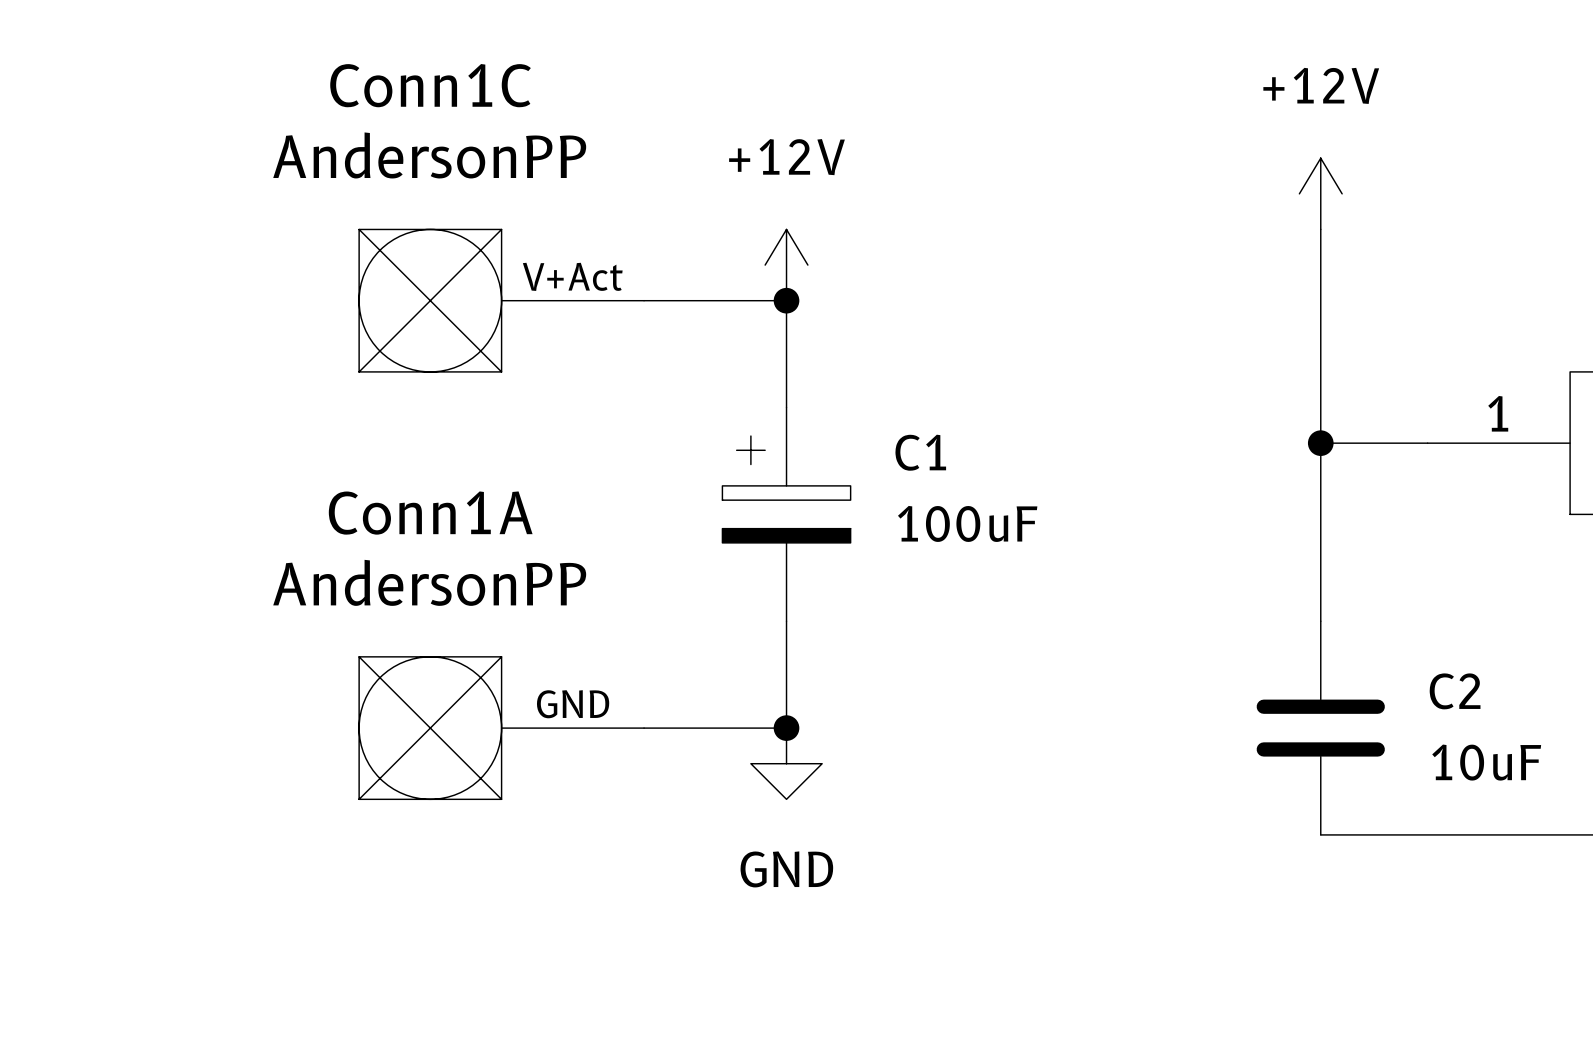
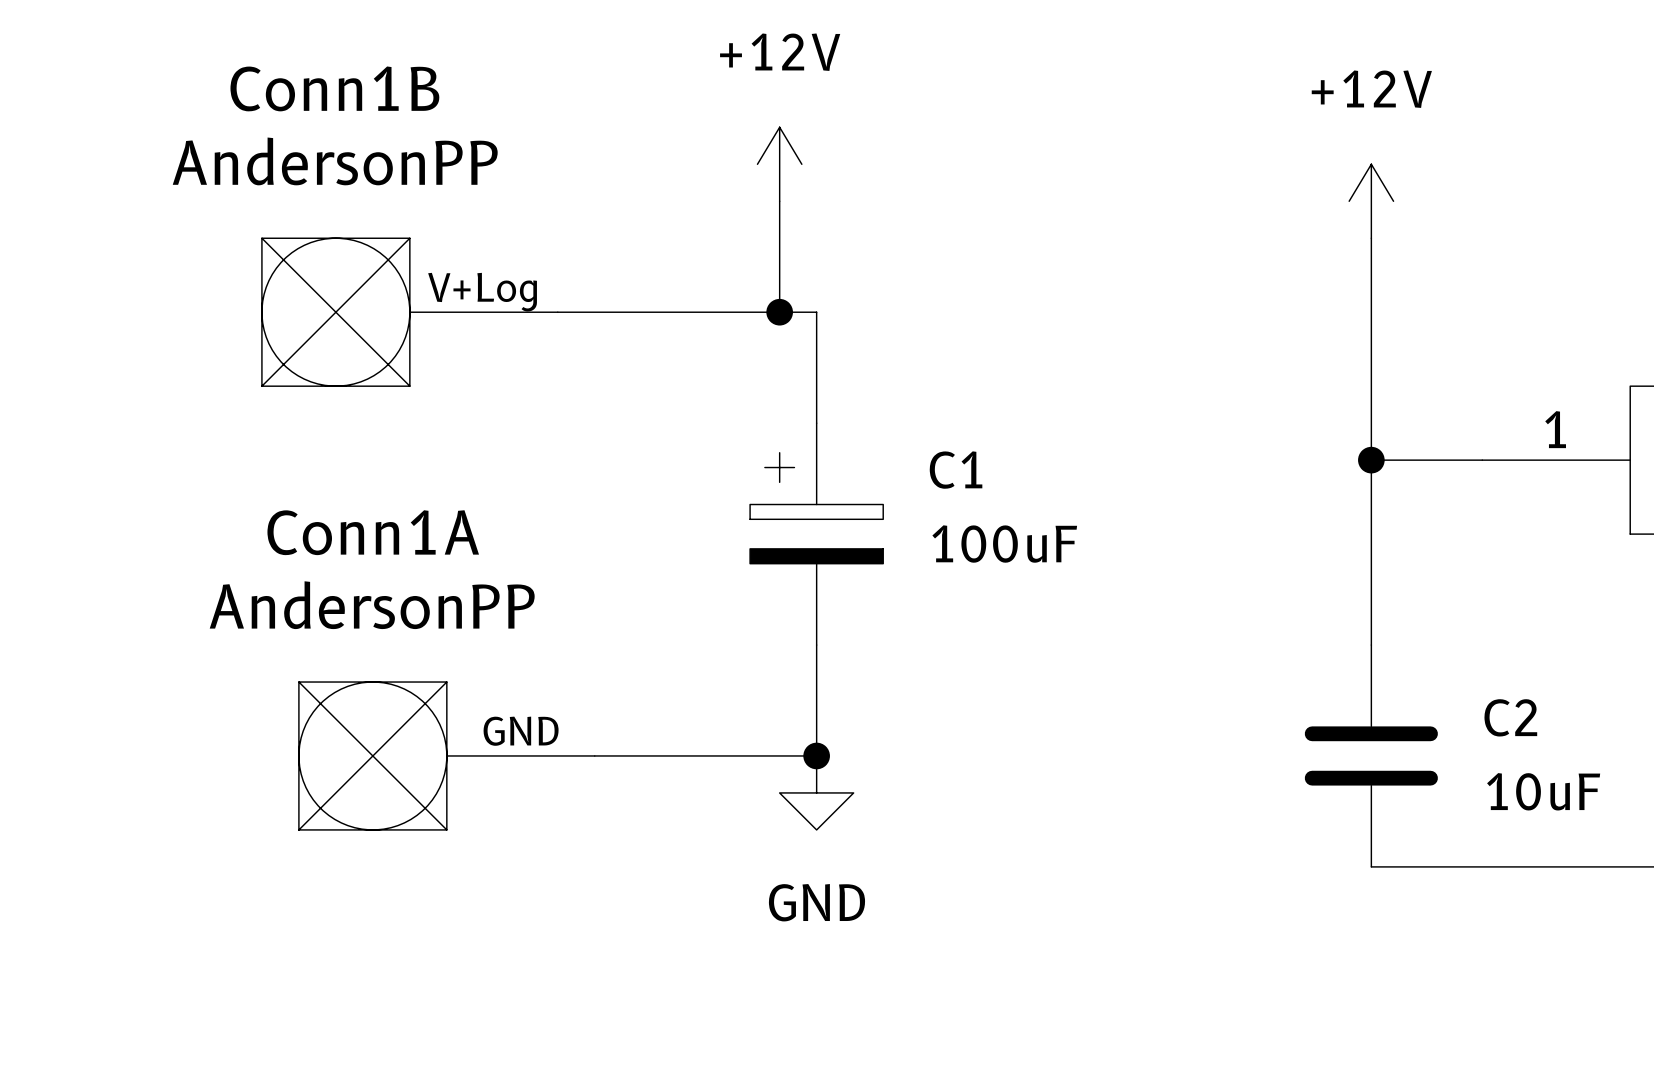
wire: none -> (779, 201) (779, 312)
power symbol position: +12V (786, 265) -> +12V (779, 164)
Conn1B: none -> AndersonPP (409, 312)
Conn1C: AndersonPP (501, 300) -> none
junction position: (786, 300) -> (779, 312)
Conn1A position: (501, 728) -> (446, 755)

